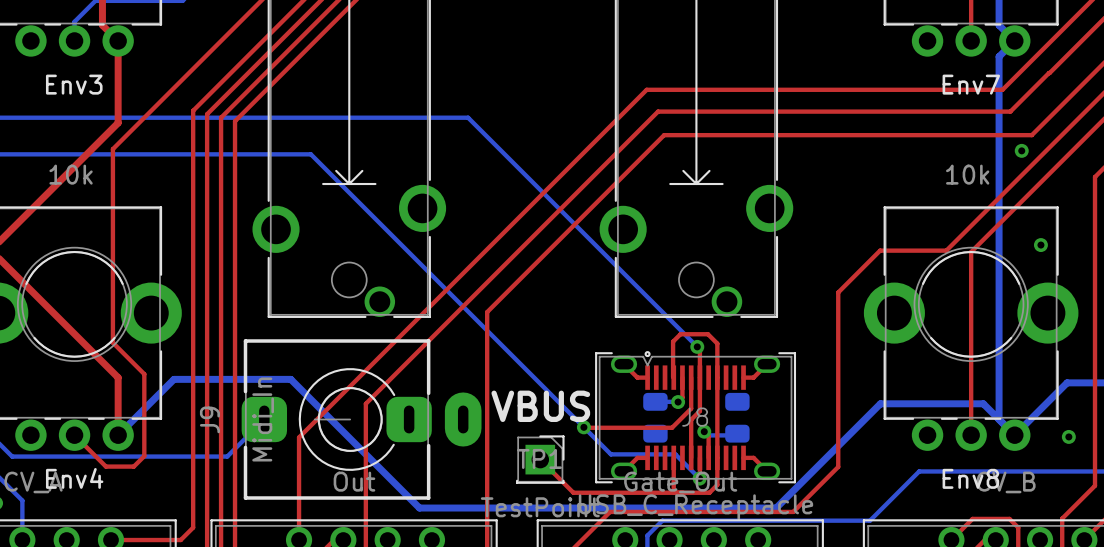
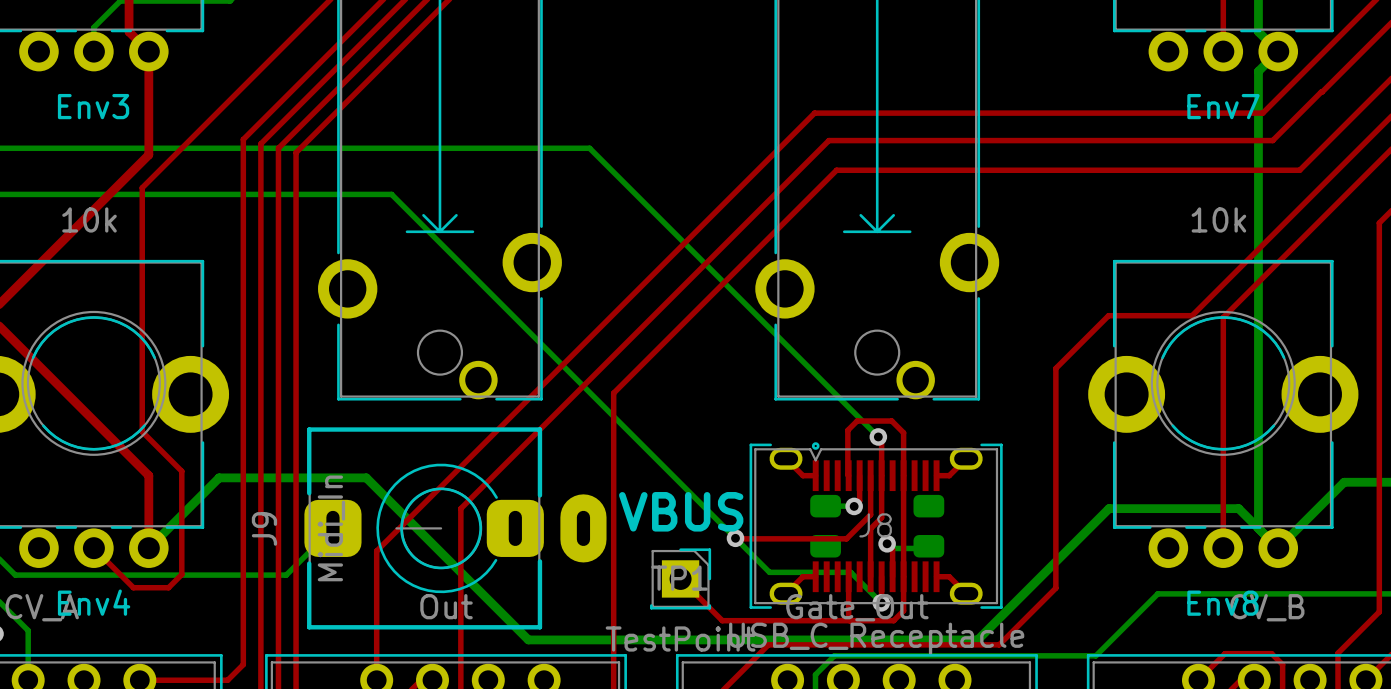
via: (1021, 150) -> none
via: (1040, 245) -> none
via: (1068, 436) -> none

